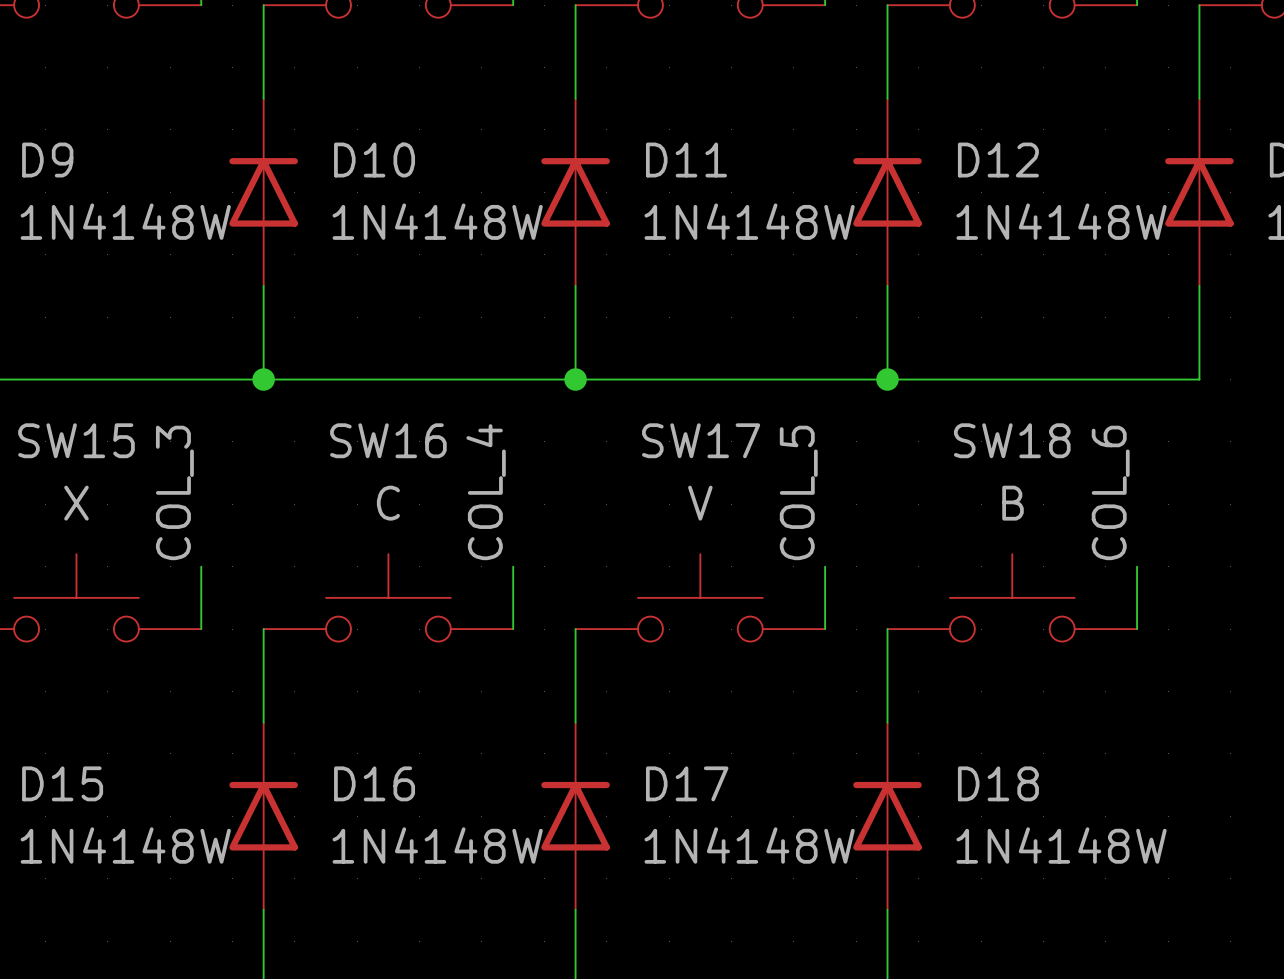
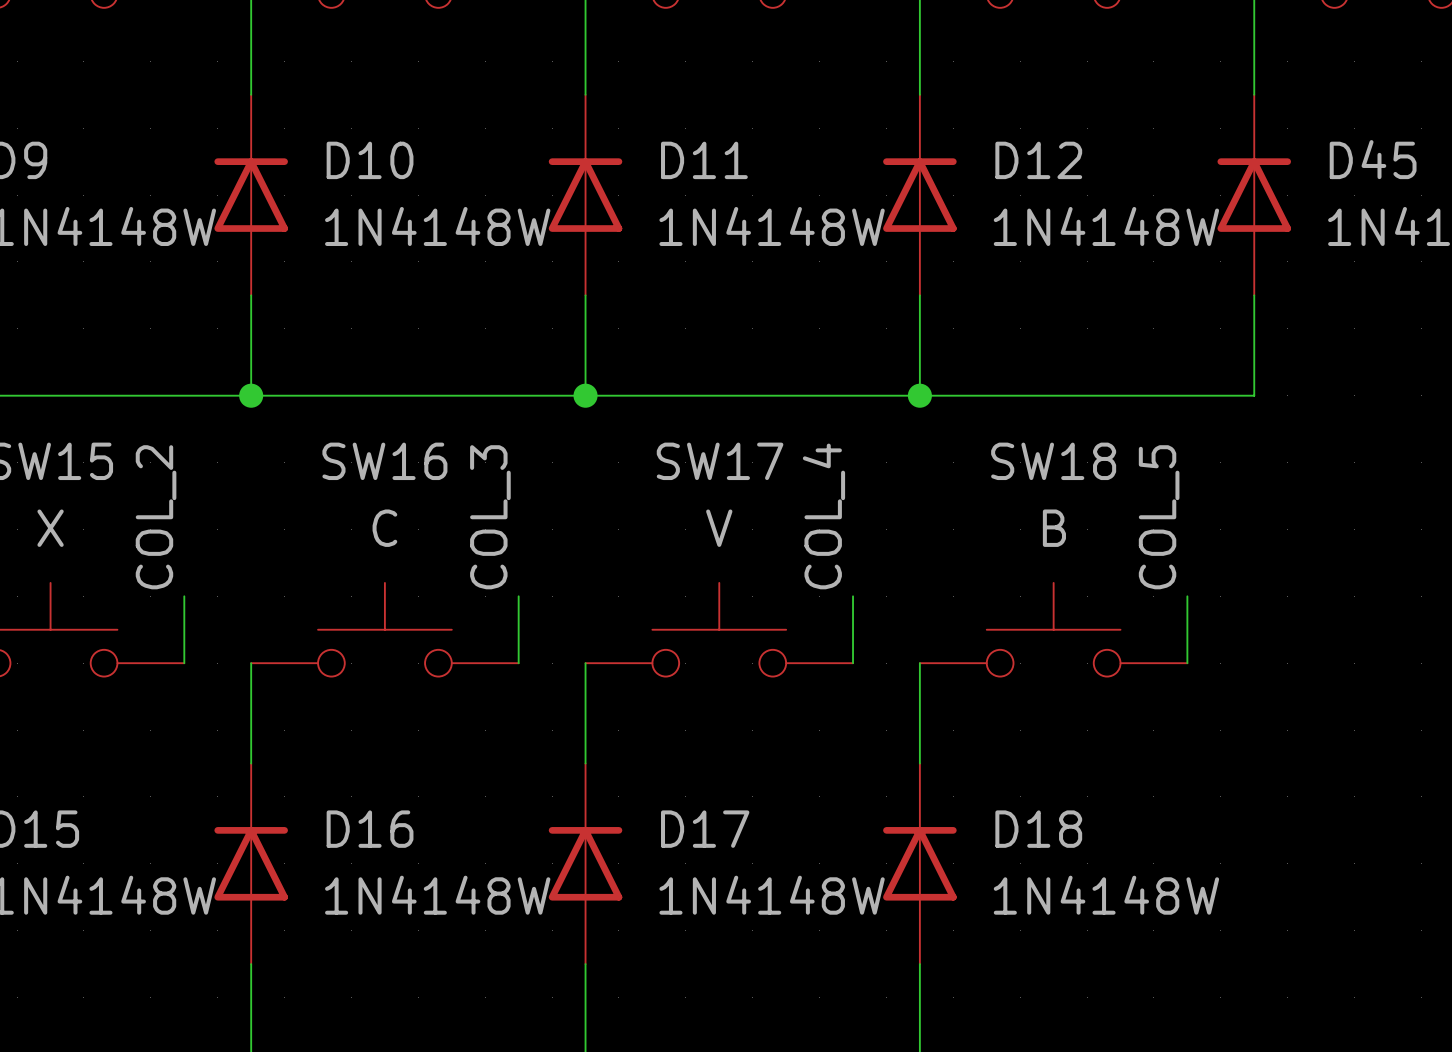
label: COL_3 (174, 492) -> COL_2 (156, 517)
label: COL_4 (486, 492) -> COL_3 (490, 517)
label: COL_5 (798, 492) -> COL_4 (823, 516)
label: COL_6 (1110, 492) -> COL_5 (1159, 517)

